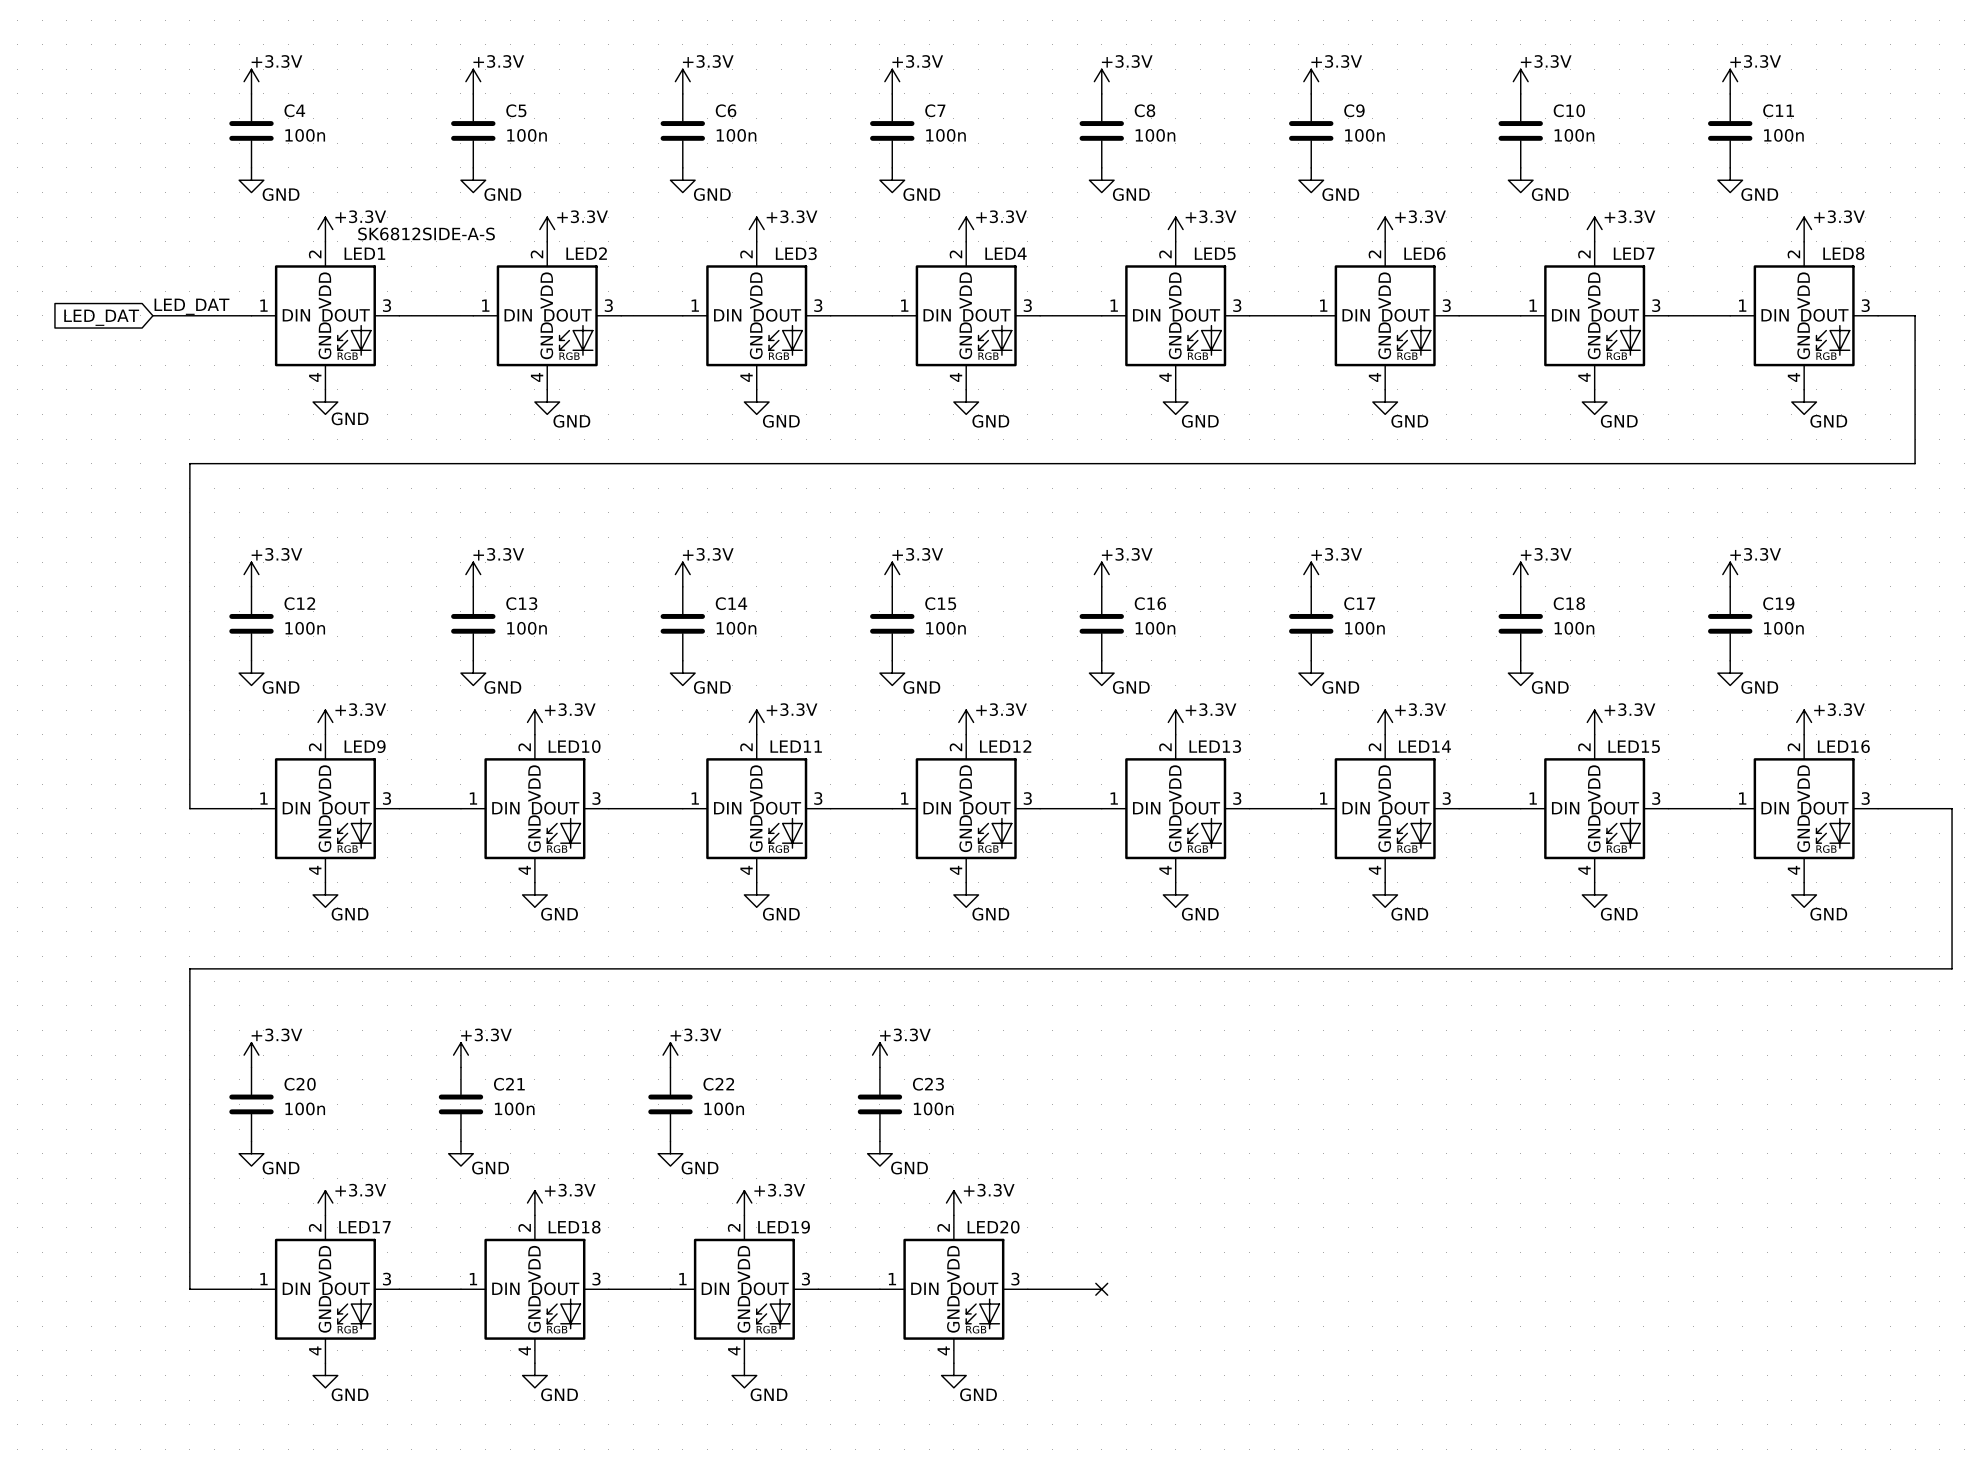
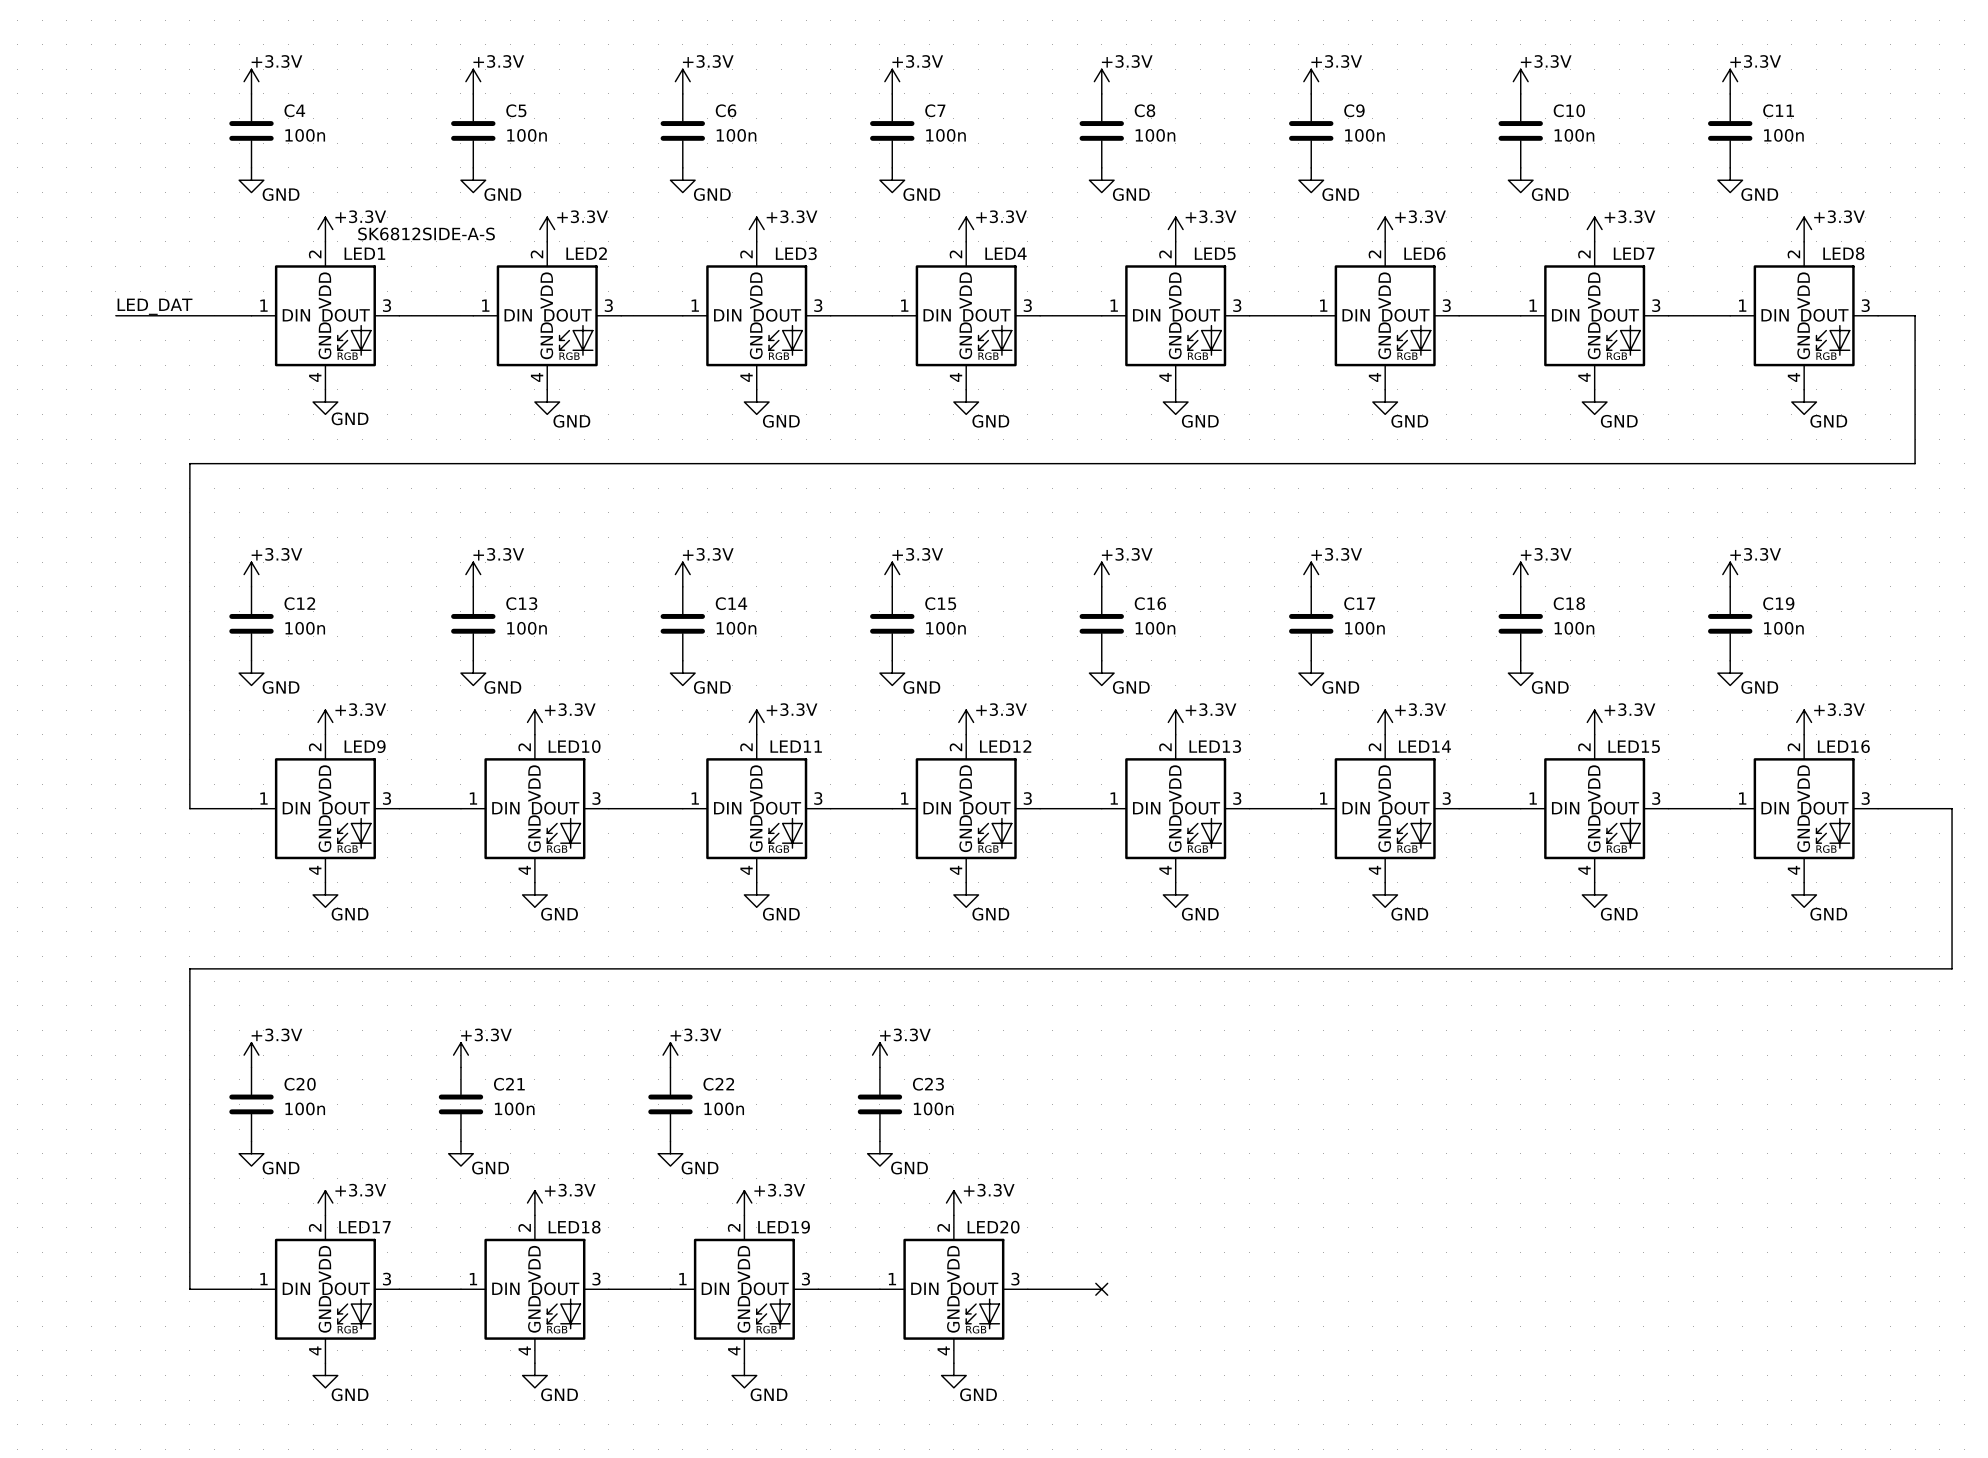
label position: LED_DAT (192, 306) -> LED_DAT (155, 306)
wire: none -> (115, 315) (152, 315)
global label: LED_DAT (101, 317) -> none

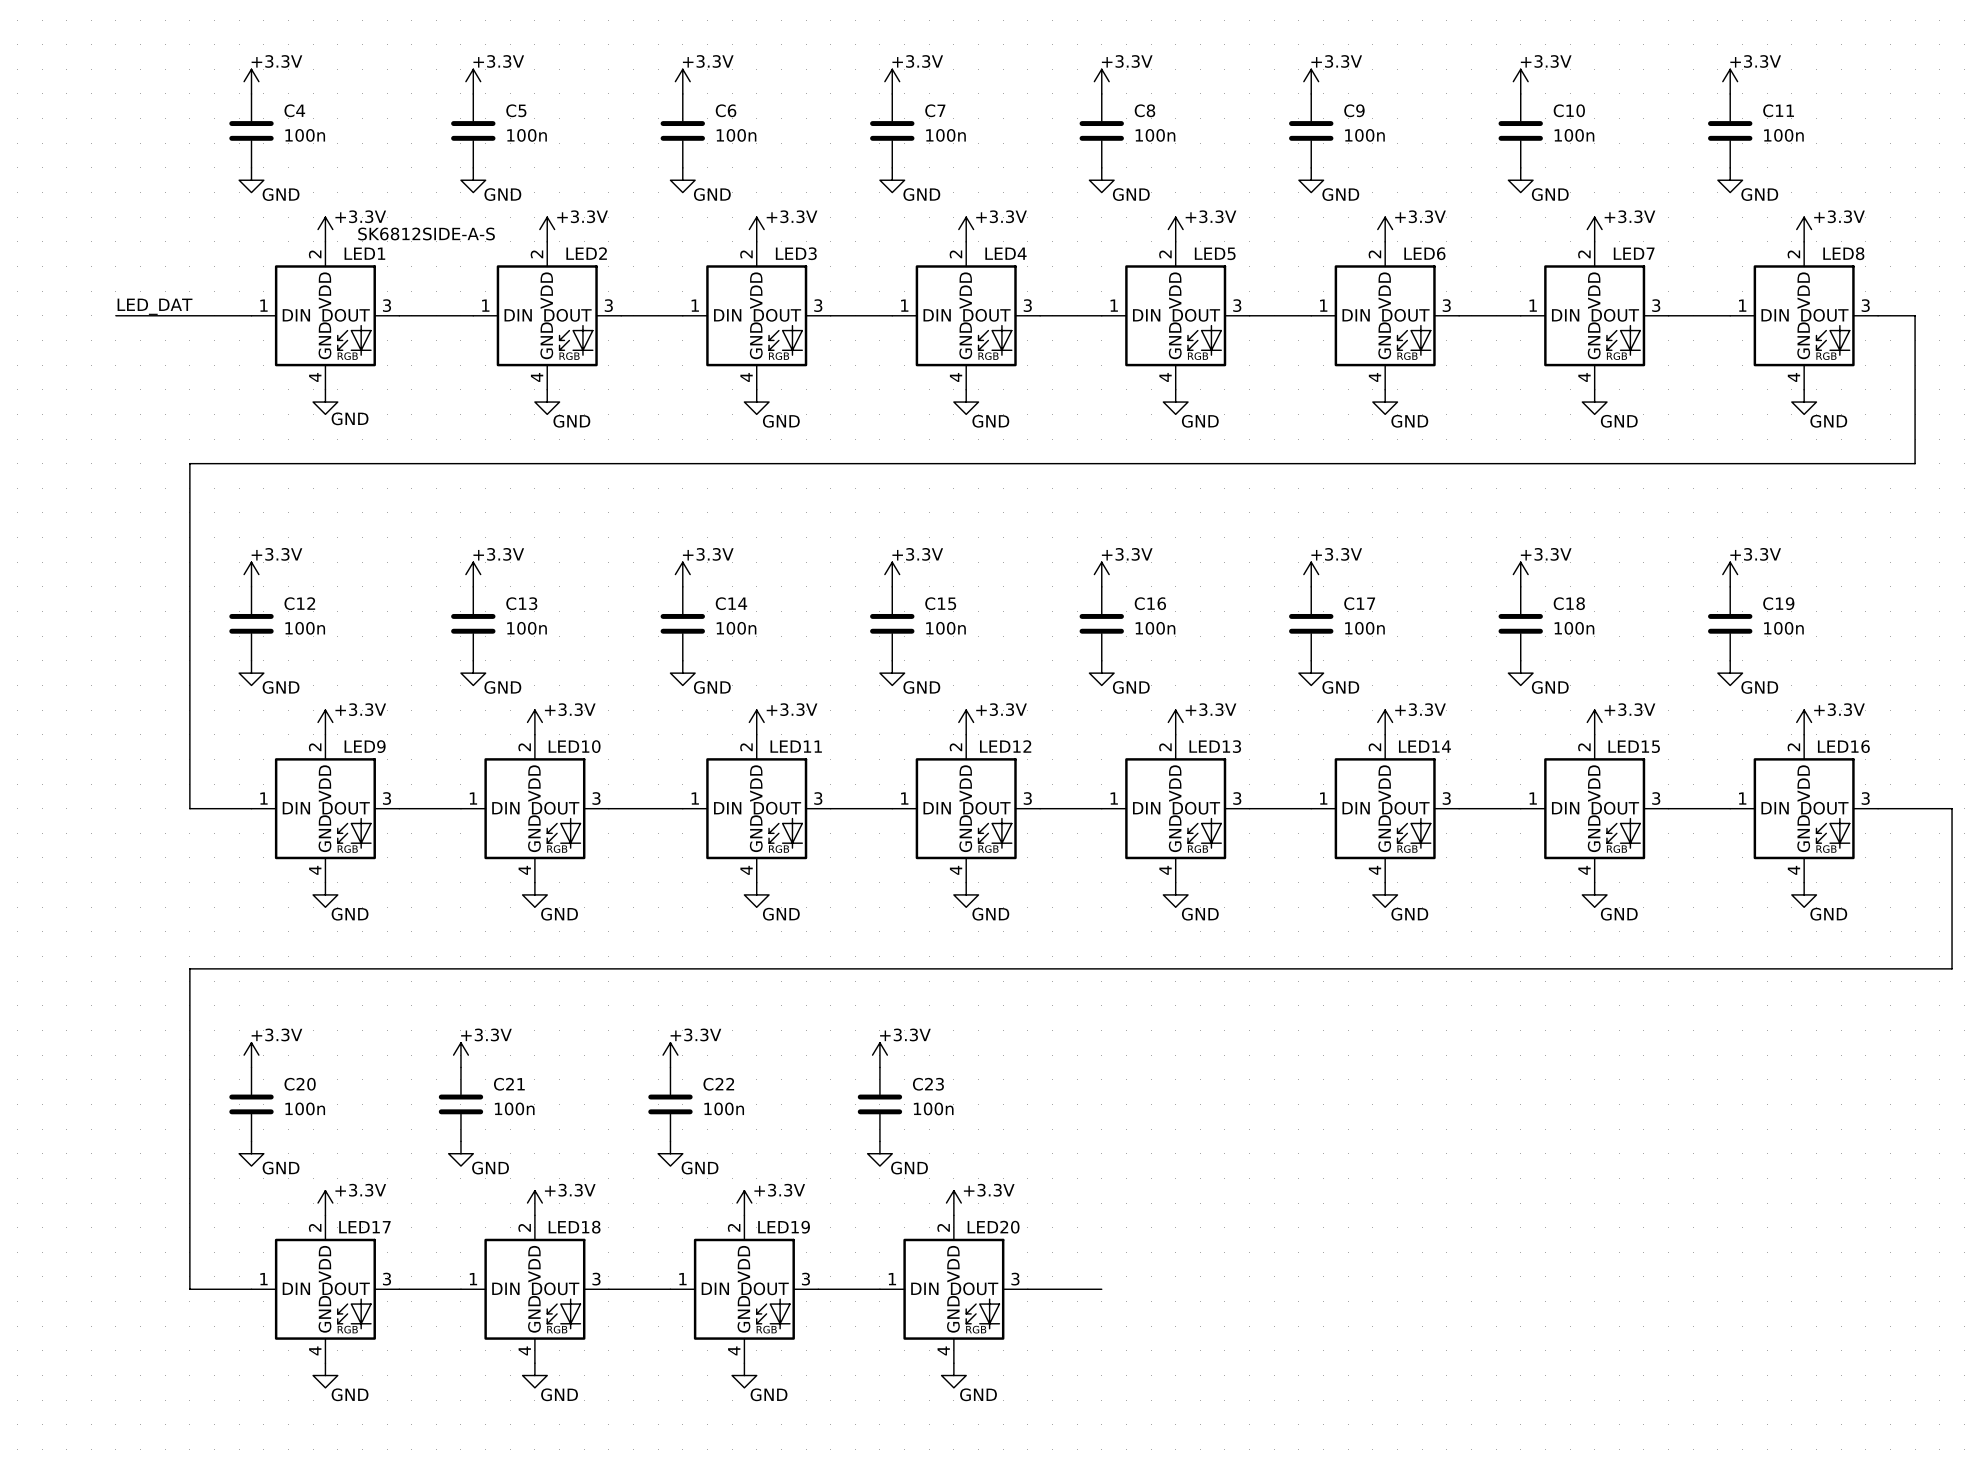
no-connect mark: (1101, 1289) -> none

